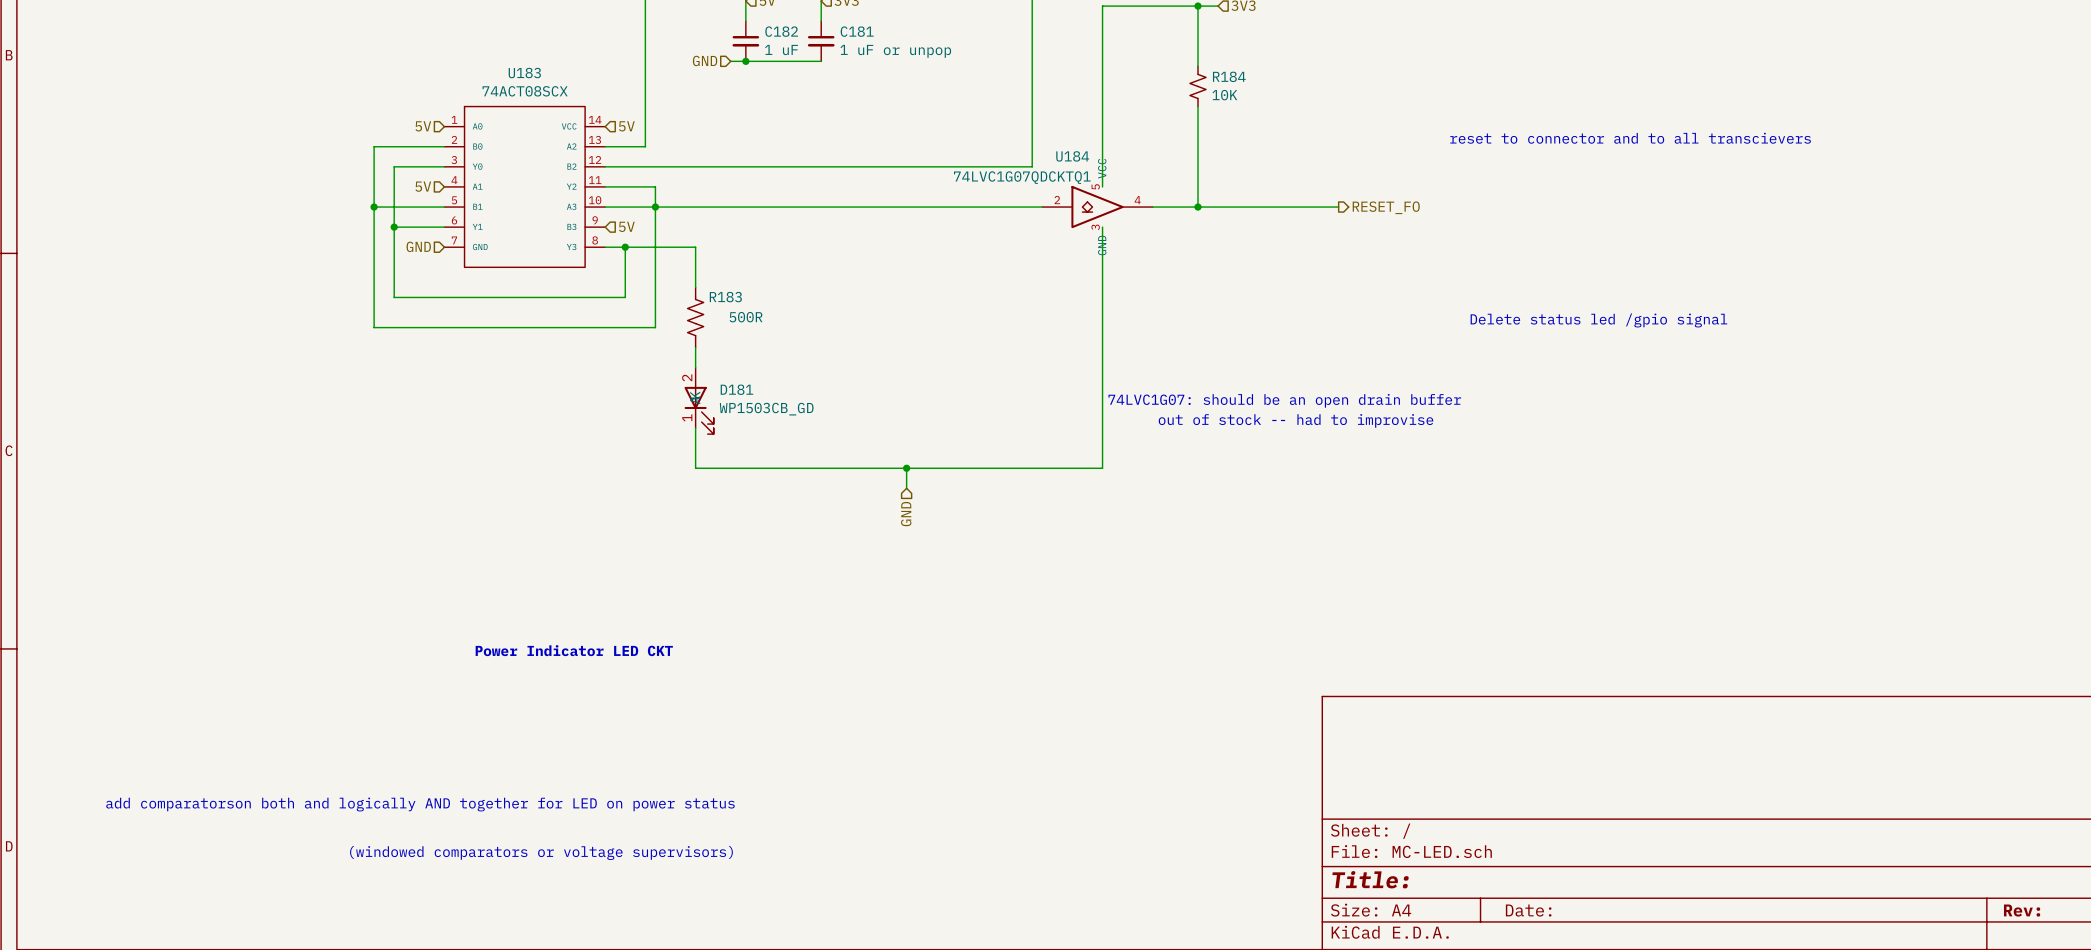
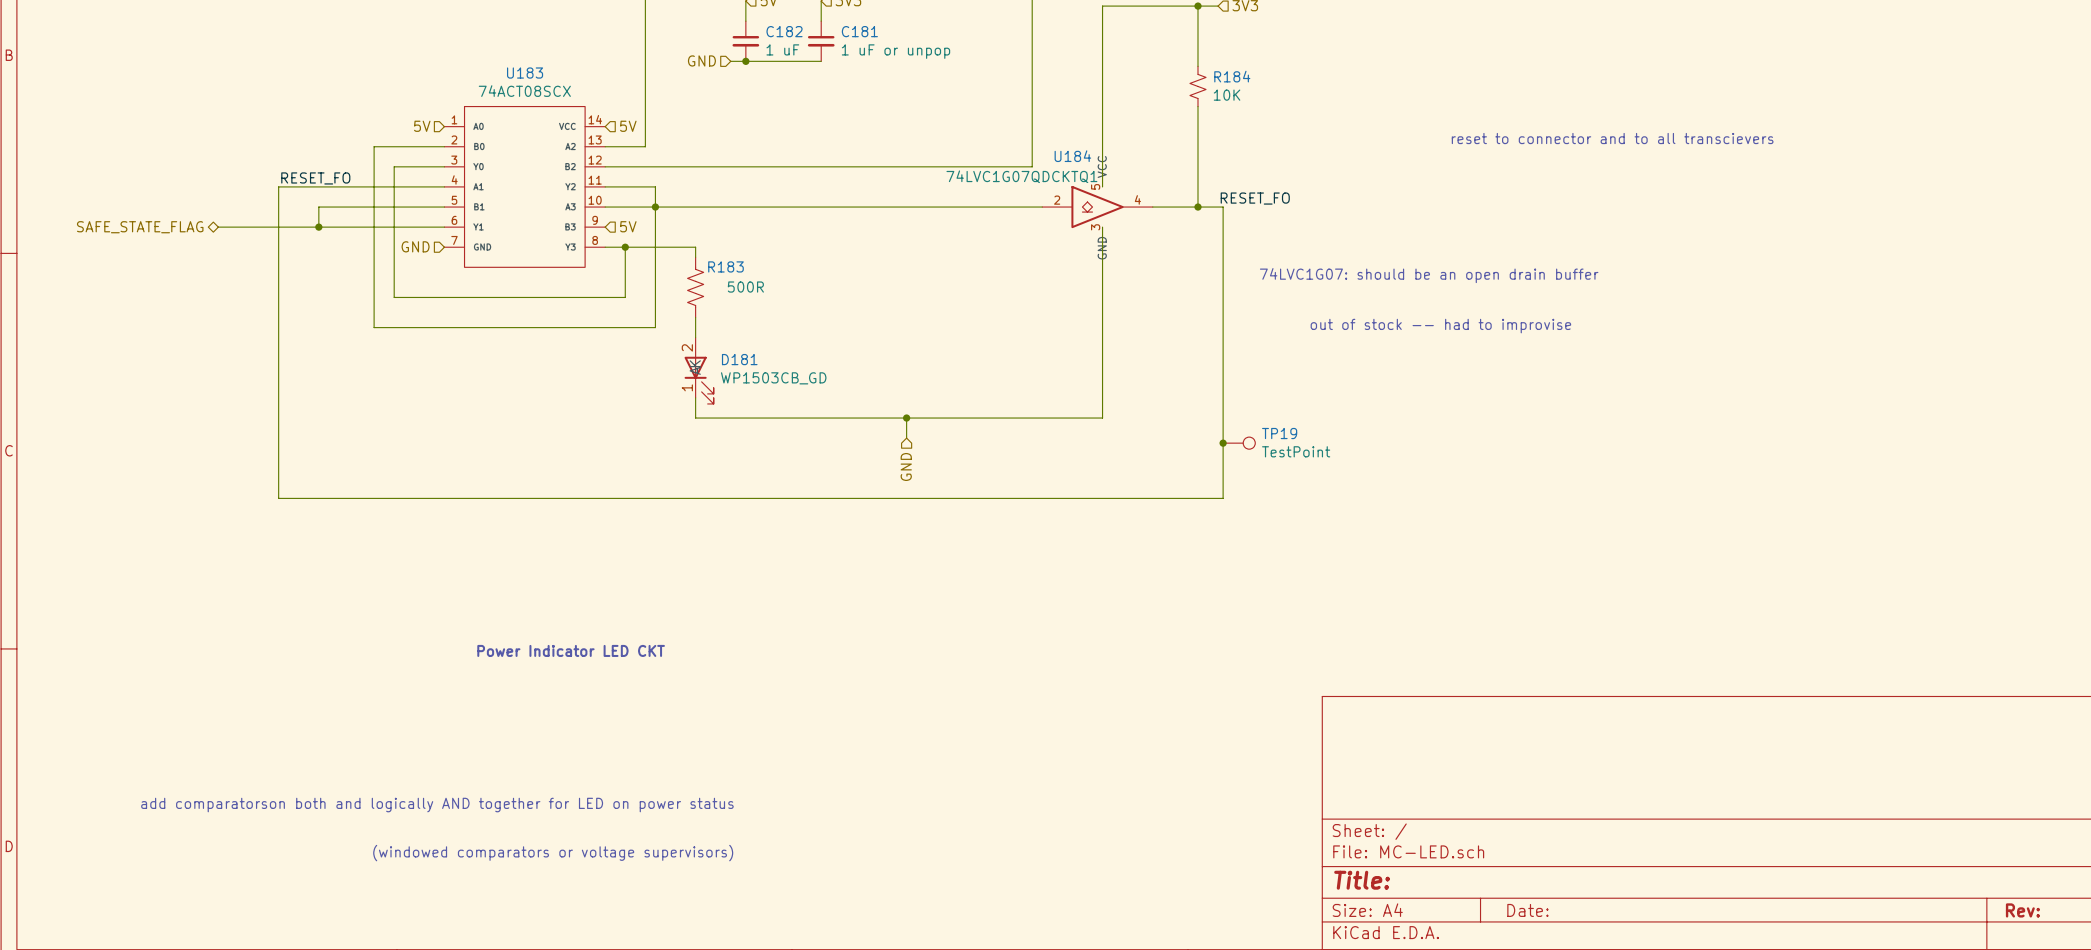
label: none -> RESET_FO (315, 178)
hierarchical label: 5V (423, 186) -> none
label: none -> RESET_FO (1255, 198)
wire: none -> (374, 207) (318, 207) (318, 227)
junction: (374, 207) -> none
wire: (1223, 207) (1338, 207) -> (1223, 207) (1223, 498) (278, 498) (278, 186) (444, 186)
hierarchical label: RESET_FO (1386, 207) -> none
hierarchical label: none -> SAFE_STATE_FLAG (140, 227)
wire: none -> (218, 227) (394, 227)
junction: none -> (318, 227)
junction: (394, 227) -> none
R183 position: (695, 317) -> (695, 287)
text: Delete status led /gpio signal (1598, 320) -> none
D181 position: (699, 400) -> (699, 370)
text position: 74LVC1G07: should be an open drain buffer (1284, 400) -> 74LVC1G07: should be an open drain buffer (1429, 275)
junction: none -> (906, 418)
wire: (1102, 418) (1102, 468) (695, 468) (695, 428) -> (1102, 418) (695, 418) (695, 397)
text position: out of stock -- had to improvise (1295, 420) -> out of stock -- had to improvise (1440, 326)
junction: none -> (1223, 443)
TP19: none -> TestPoint (1239, 443)
wire: (906, 468) (906, 488) -> (906, 418) (906, 438)
junction: (906, 468) -> none
hierarchical label position: GND (906, 514) -> GND (906, 466)

